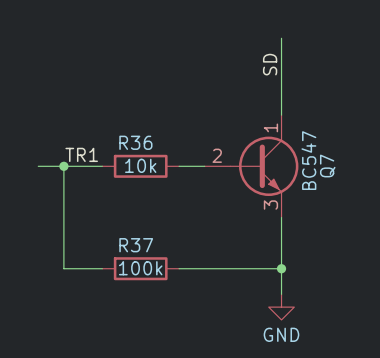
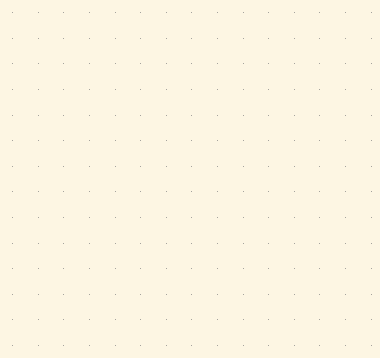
wire: (281, 38) (281, 115) -> none
label: SD (270, 64) -> none
label: TR1 (81, 154) -> none
wire: (38, 166) (102, 166) -> none
wire: (63, 166) (63, 268) (102, 268) -> none
junction: (63, 166) -> none
R36: 10k (140, 166) -> none
wire: (179, 166) (204, 166) -> none
Q7: BC547 (251, 166) -> none
wire: (281, 217) (281, 294) -> none
R37: 100k (140, 268) -> none
wire: (179, 268) (281, 268) -> none
junction: (281, 268) -> none
power symbol: GND (281, 307) -> none

